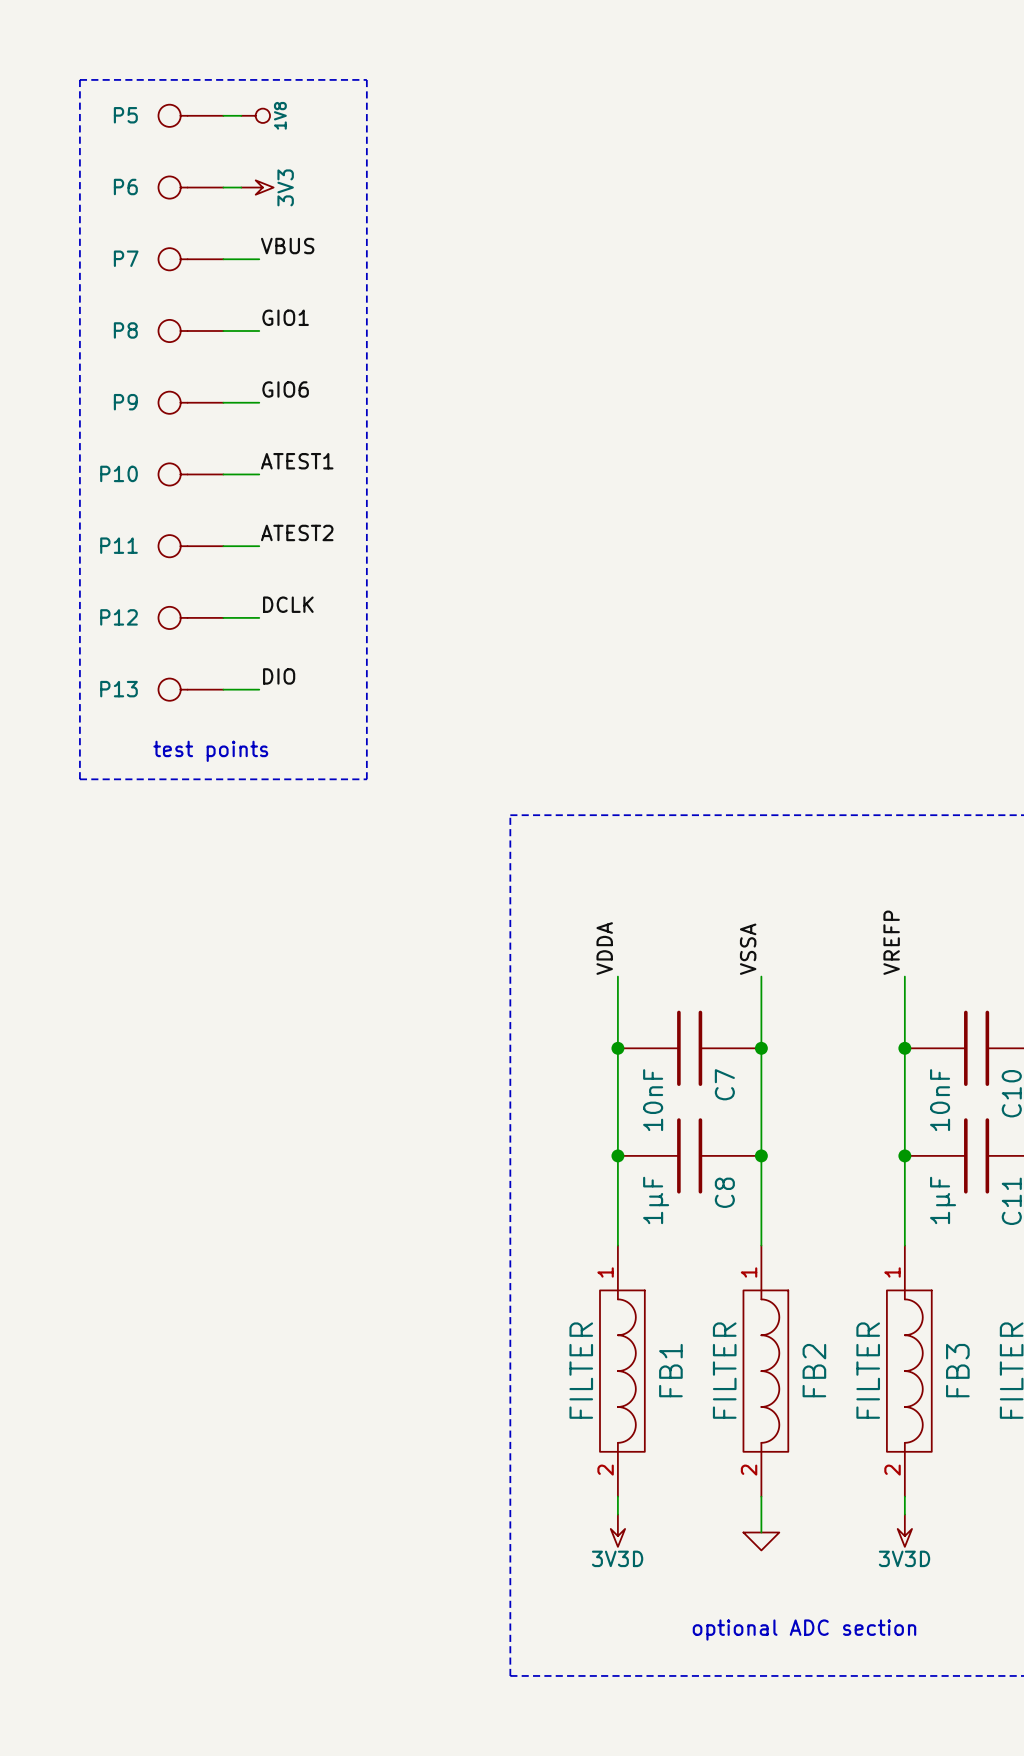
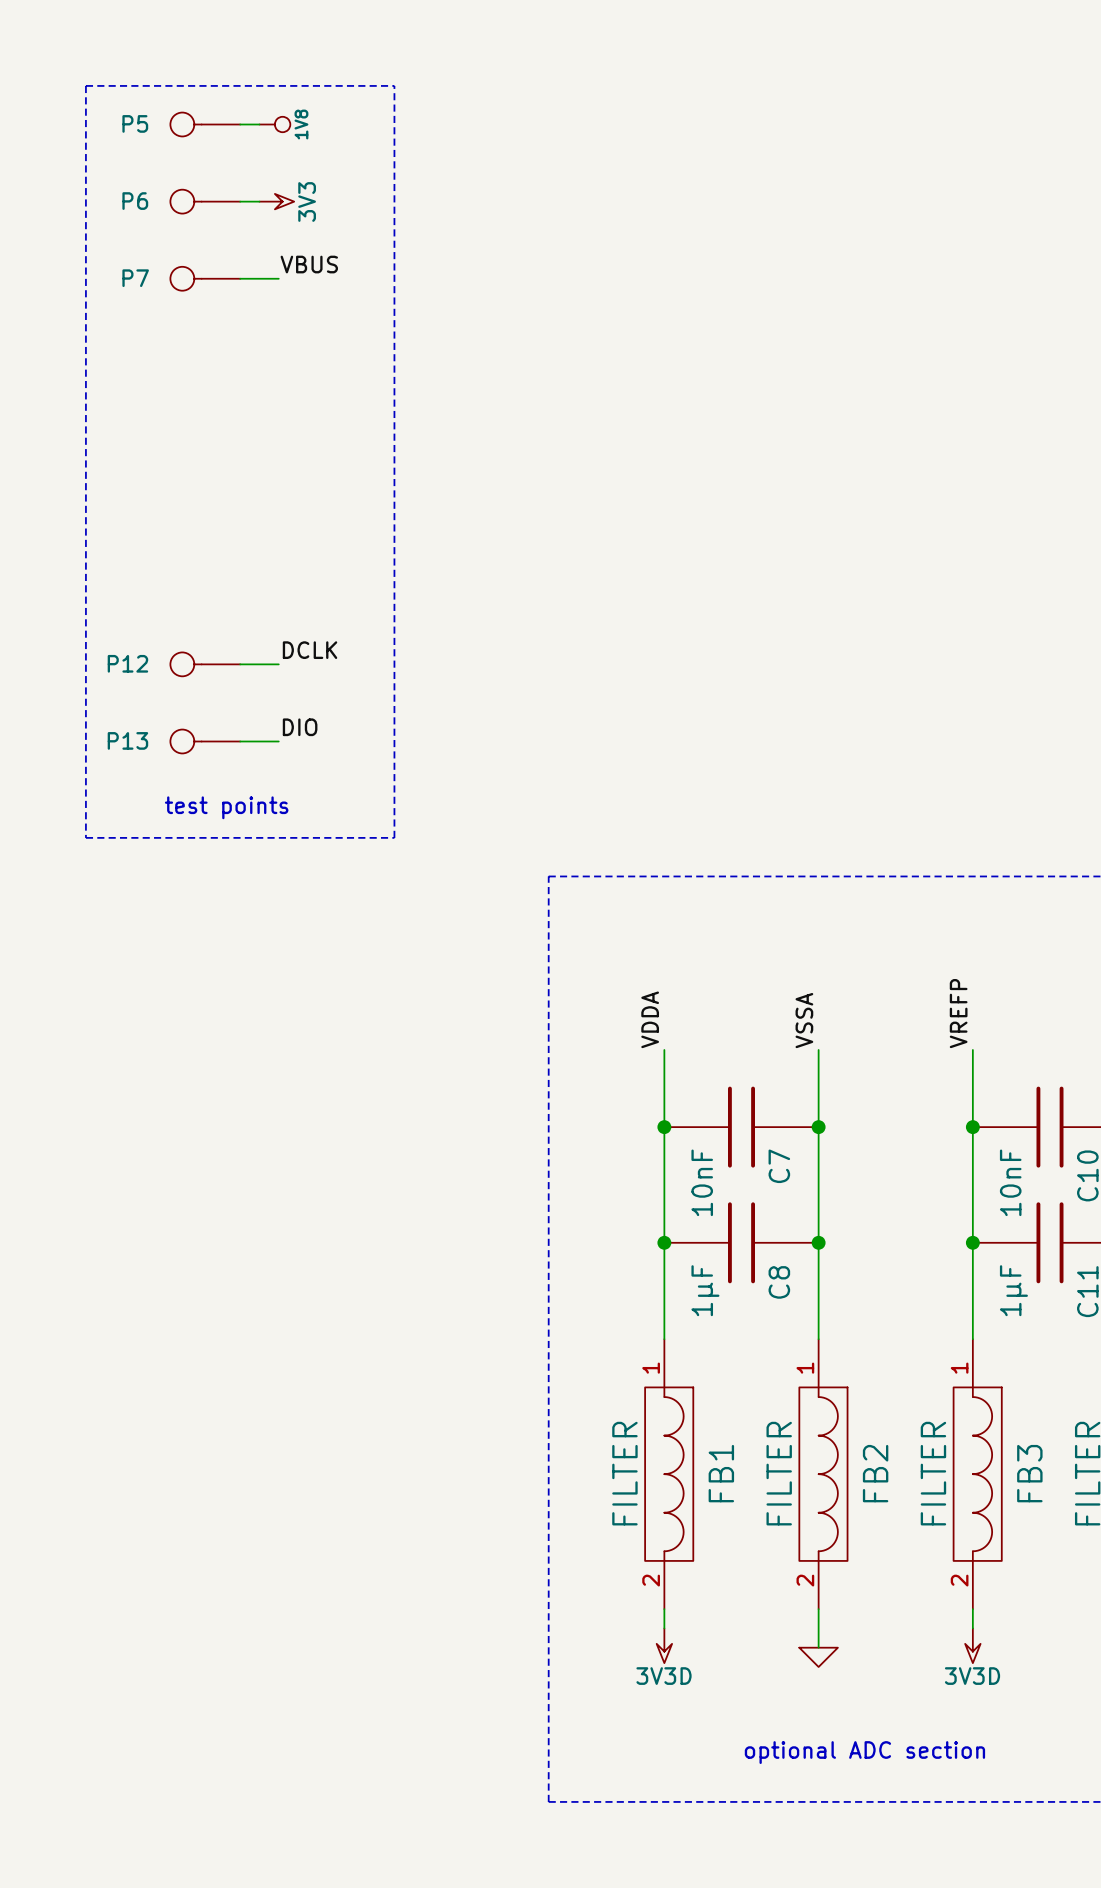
label: GIO1 (285, 317) -> none
P8: (190, 331) -> none
wire: (223, 331) (259, 331) -> none
label: GIO6 (285, 389) -> none
P9: (190, 402) -> none
wire: (223, 402) (259, 402) -> none
label: ATEST1 (297, 461) -> none
P10: (190, 474) -> none
wire: (223, 474) (259, 474) -> none
label: ATEST2 (297, 532) -> none
P11: (190, 546) -> none
wire: (223, 546) (259, 546) -> none

